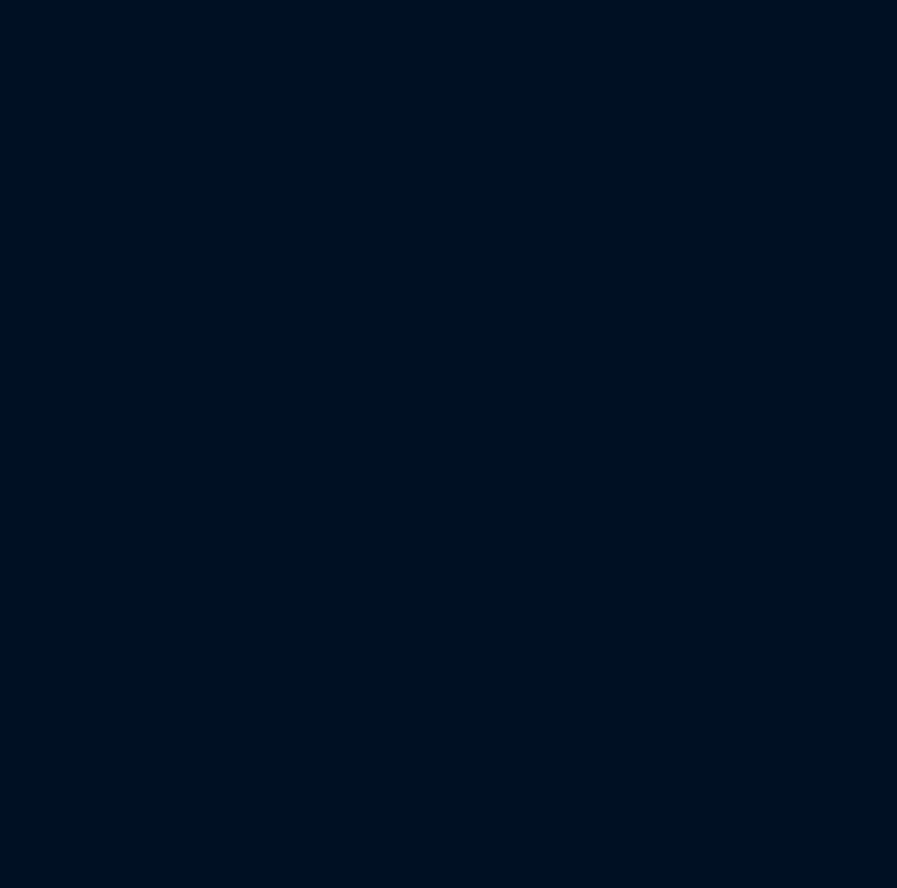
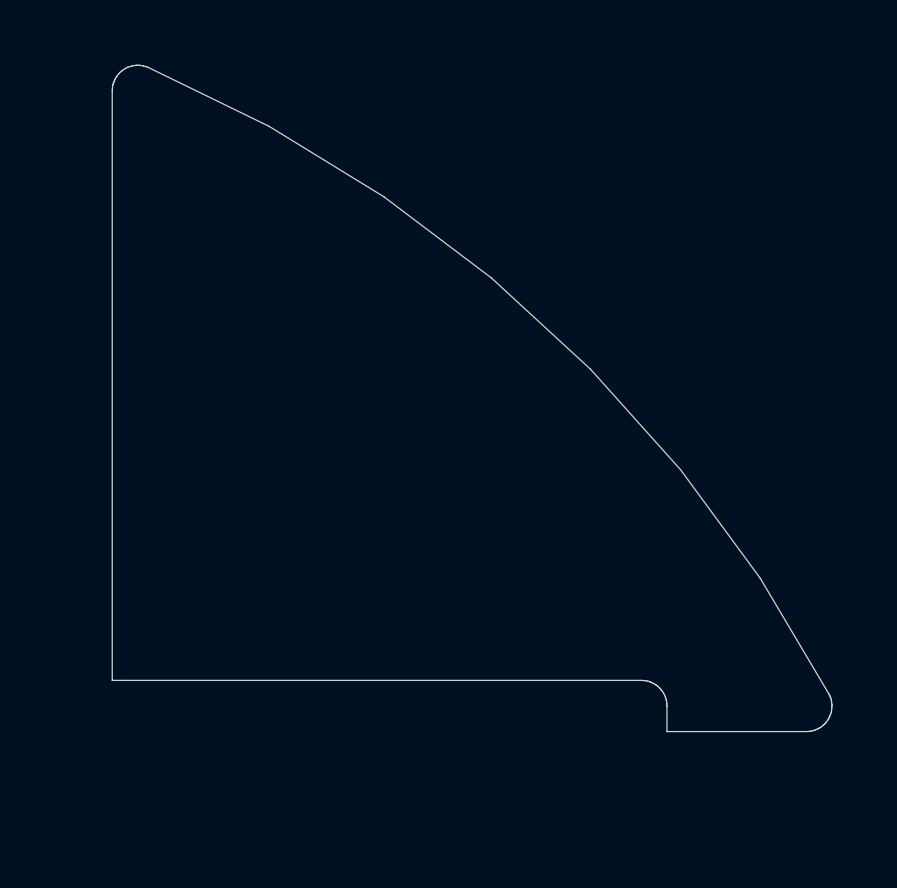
board edge: none -> (136, 65) (147, 67) (269, 126) (383, 196) (491, 277) (590, 369) (680, 469) (760, 578) (829, 696) (831, 711) (824, 723) (817, 729) (806, 731) (666, 731) (666, 705) (664, 695) (656, 684) (641, 680) (112, 680) (112, 90) (114, 79) (120, 72) (127, 67) (136, 65)

